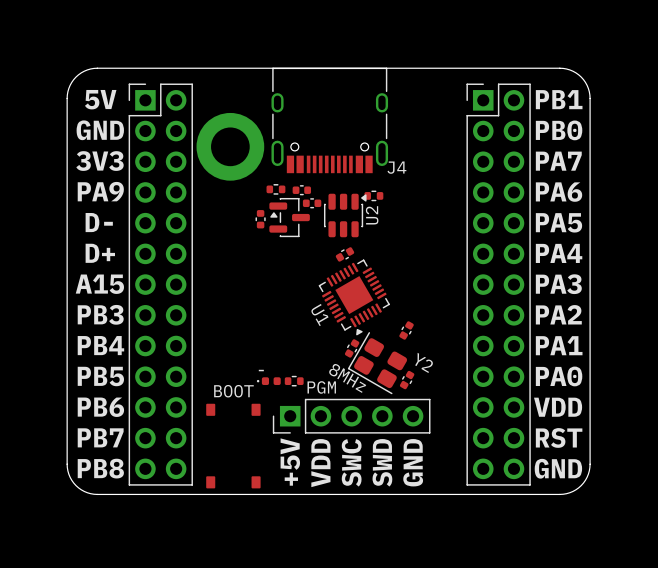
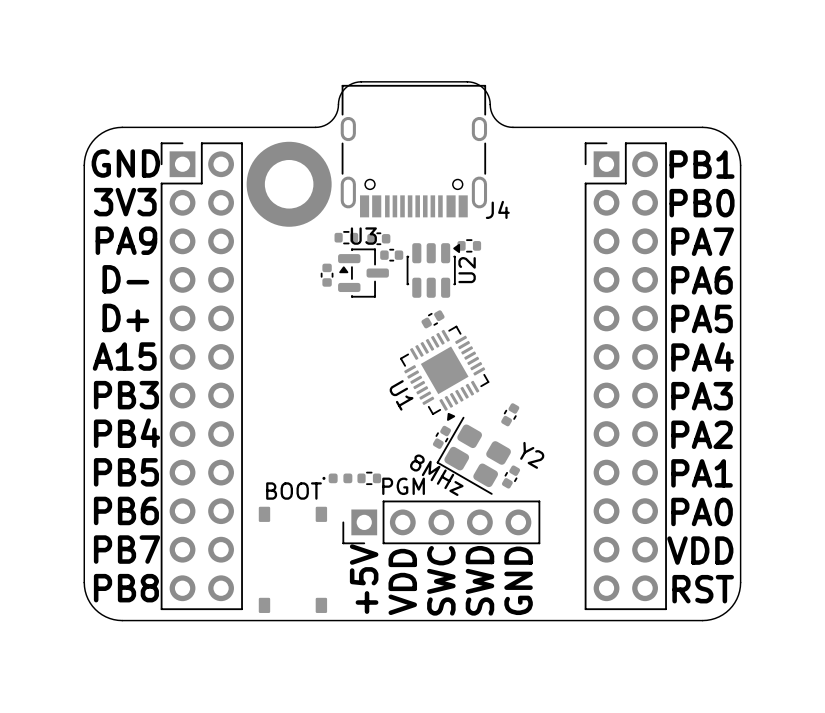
text: 5V (100, 99) -> none
text: PB1 (559, 99) -> none
text: PB0 (559, 130) -> PB1 (702, 164)
board edge: (67, 131) (67, 95) (70, 85) (81, 72) (97, 68) (563, 68) (575, 72) (587, 85) (589, 95) (590, 131) -> (84, 165) (86, 152) (92, 141) (102, 133) (117, 127) (321, 126) (329, 122) (335, 115) (340, 95) (345, 88) (352, 83) (361, 81) (473, 82) (481, 86) (487, 93) (494, 118) (501, 124) (510, 127) (711, 128) (722, 133) (732, 141) (738, 152) (740, 165)
text: PA7 (558, 161) -> PB0 (702, 203)
U3 name: none -> U3 (363, 236)
text: PA6 (559, 192) -> PA7 (702, 241)
text: PA5 (558, 222) -> PA6 (702, 280)
text: PA4 (559, 253) -> PA5 (702, 318)
part: (160, 284) -> none
part: (498, 284) -> none
text: PA3 (558, 284) -> PA4 (702, 356)
part: none -> (201, 376)
part: none -> (625, 376)
text: PA2 (558, 314) -> PA3 (702, 396)
text: PA1 (559, 345) -> PA2 (702, 434)
text: - (261, 370) -> none
text: PA0 (559, 376) -> PA1 (702, 473)
text: VDD (558, 407) -> PA0 (702, 511)
text: RST (559, 437) -> VDD (700, 550)
text: GND (558, 468) -> RST (703, 589)

